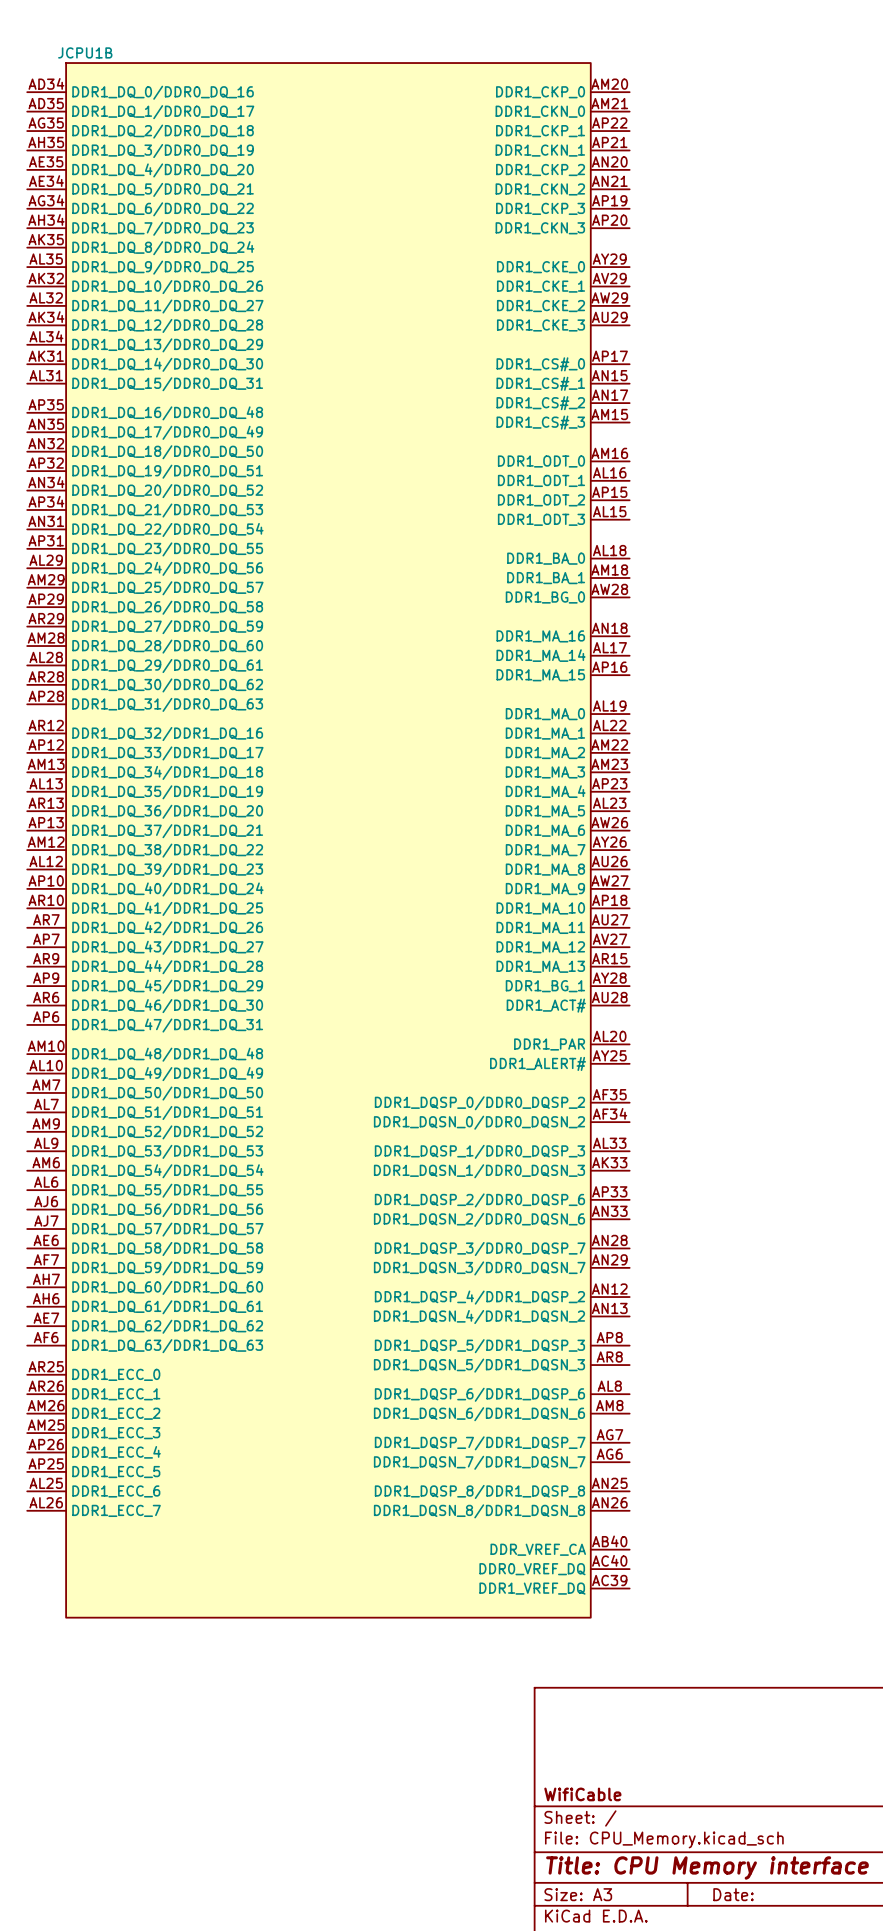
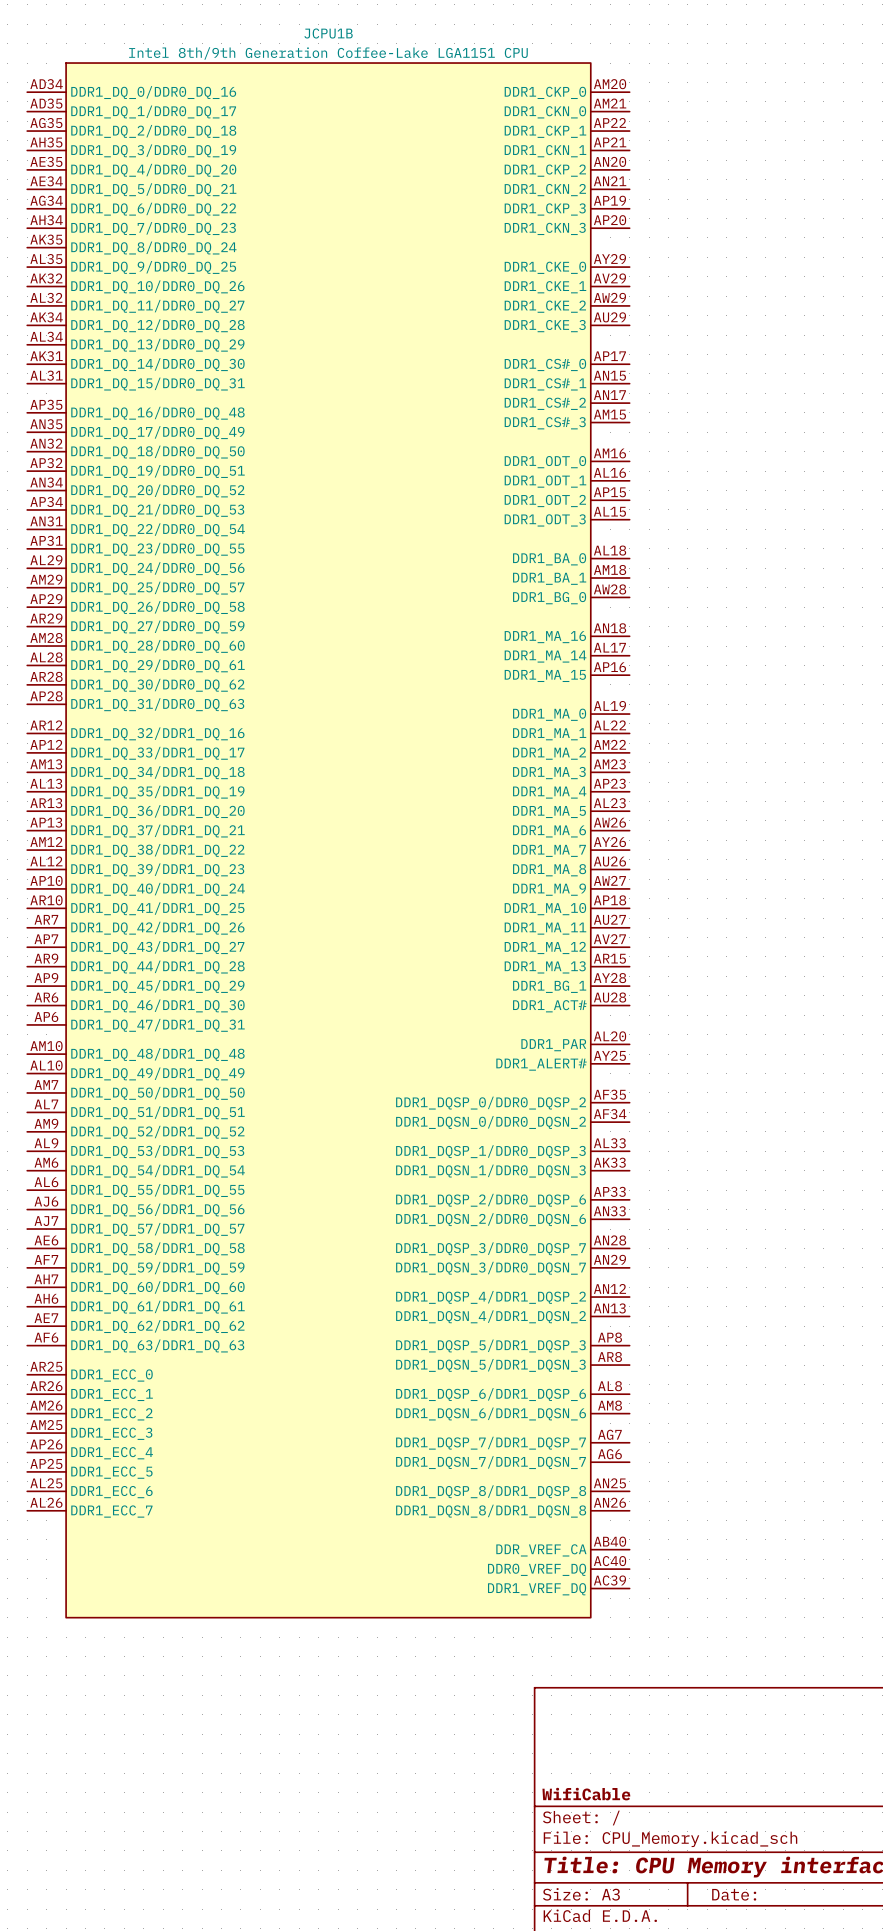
JCPU1B name position: JCPU1B (85, 52) -> JCPU1B (328, 33)
JCPU1B value: none -> Intel 8th/9th Generation Coffee-Lake LGA1151 CPU (328, 53)

